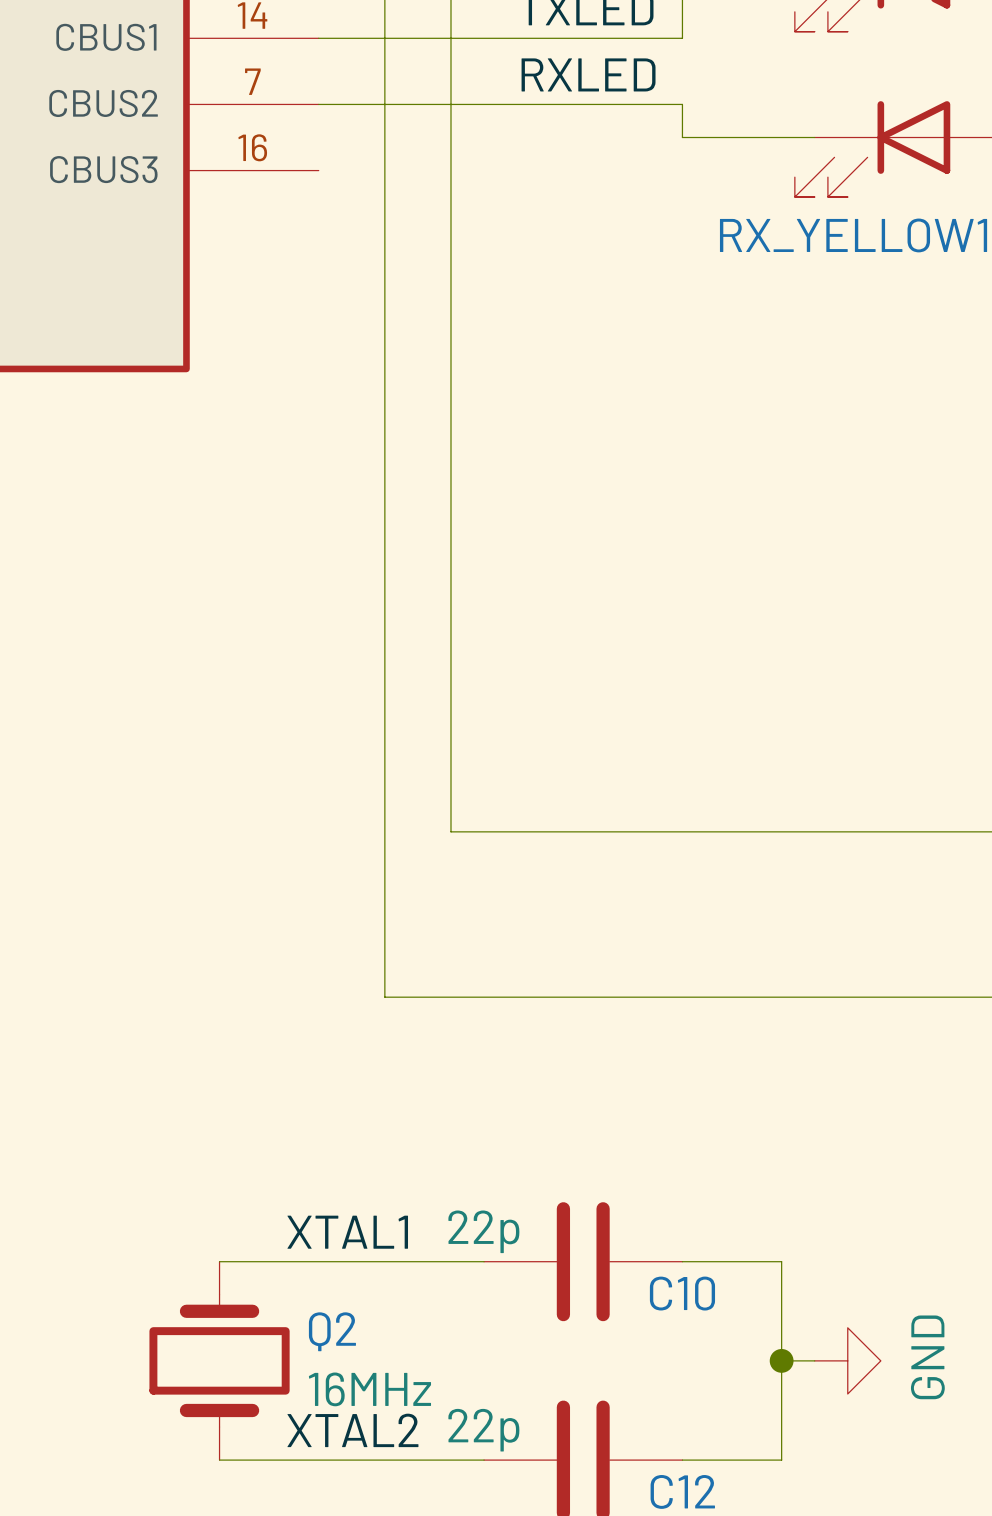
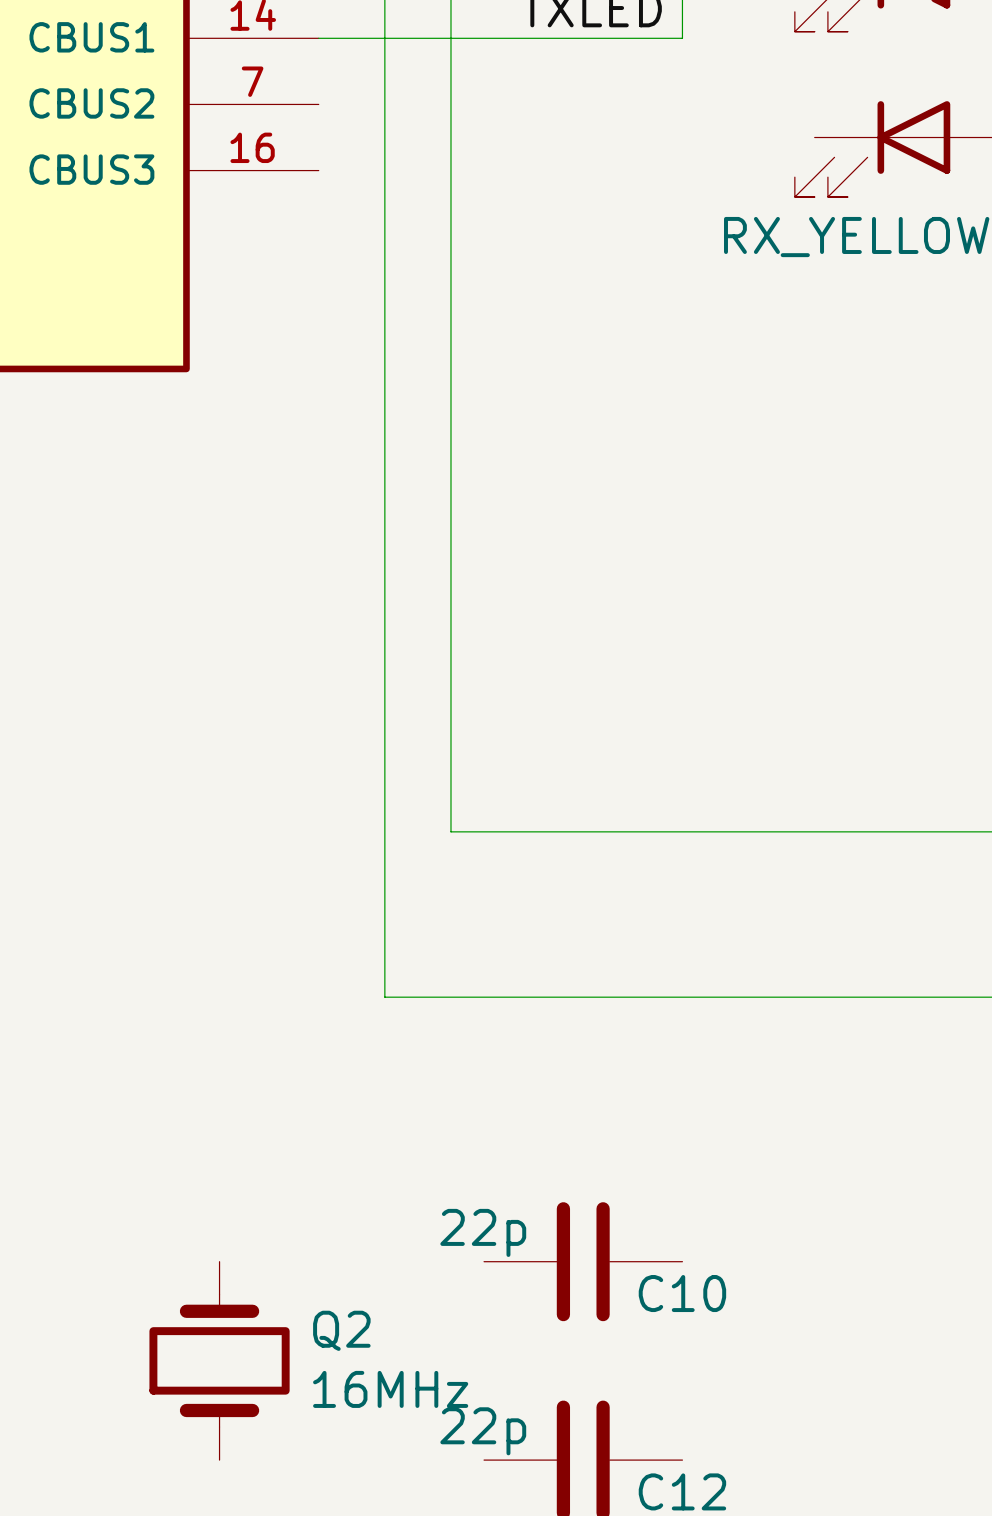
label: RXLED (588, 74) -> none
wire: (318, 104) (682, 104) (682, 137) (814, 137) -> none
label: XTAL1 (347, 1232) -> none
wire: (219, 1261) (484, 1261) -> none
wire: (682, 1261) (781, 1261) (781, 1460) (682, 1460) -> none
wire: (781, 1360) (814, 1360) -> none
junction: (781, 1360) -> none
power symbol: GND (847, 1360) -> none
label: XTAL2 (352, 1430) -> none
wire: (219, 1460) (484, 1460) -> none

